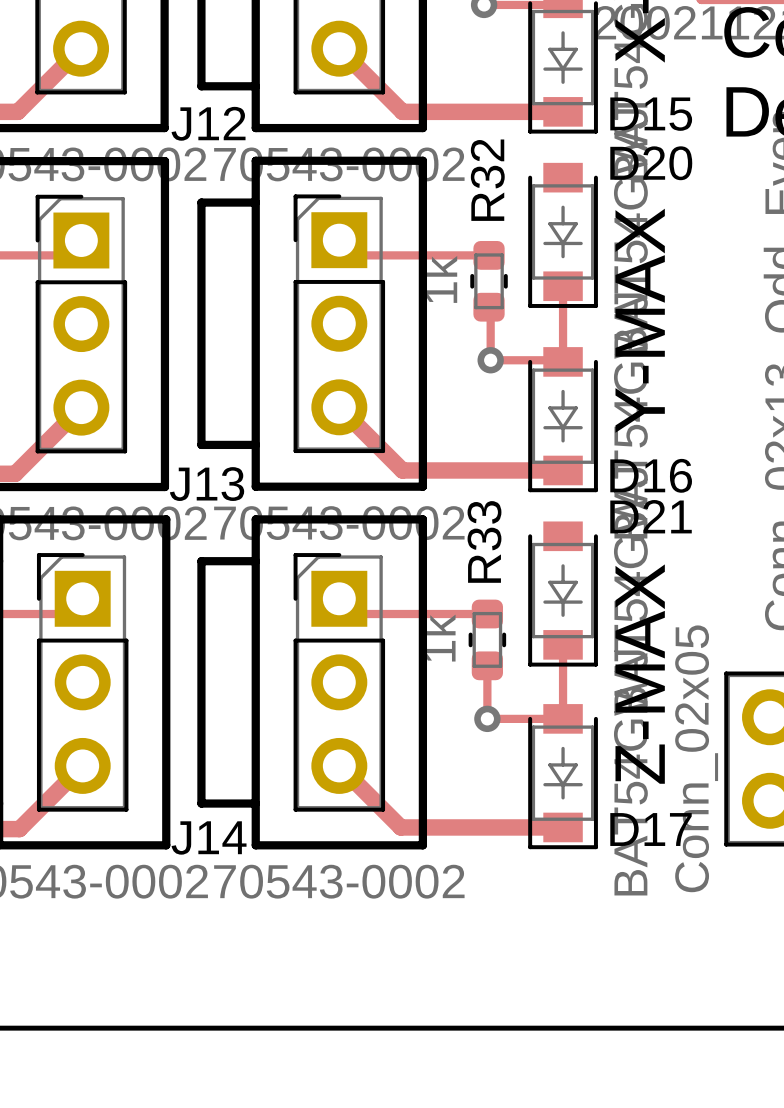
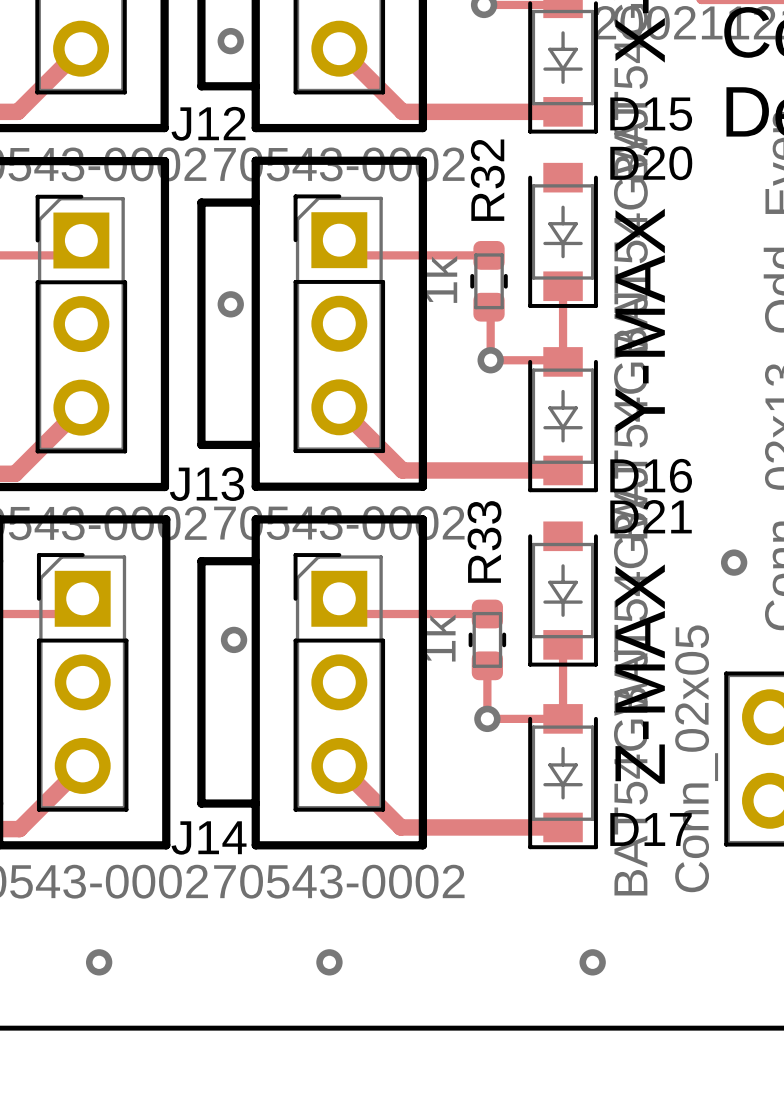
via: none -> (230, 41)
via: none -> (230, 304)
via: none -> (734, 562)
via: none -> (234, 639)
via: none -> (99, 962)
via: none -> (329, 962)
via: none -> (592, 962)

